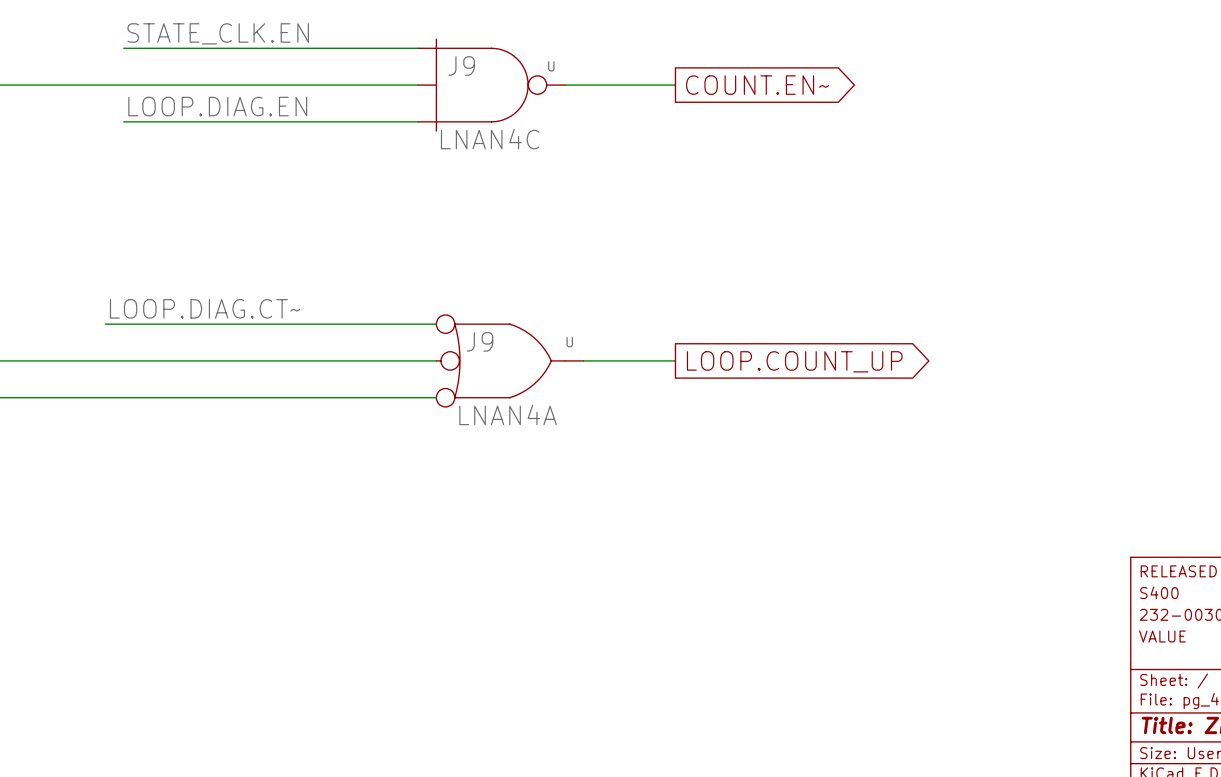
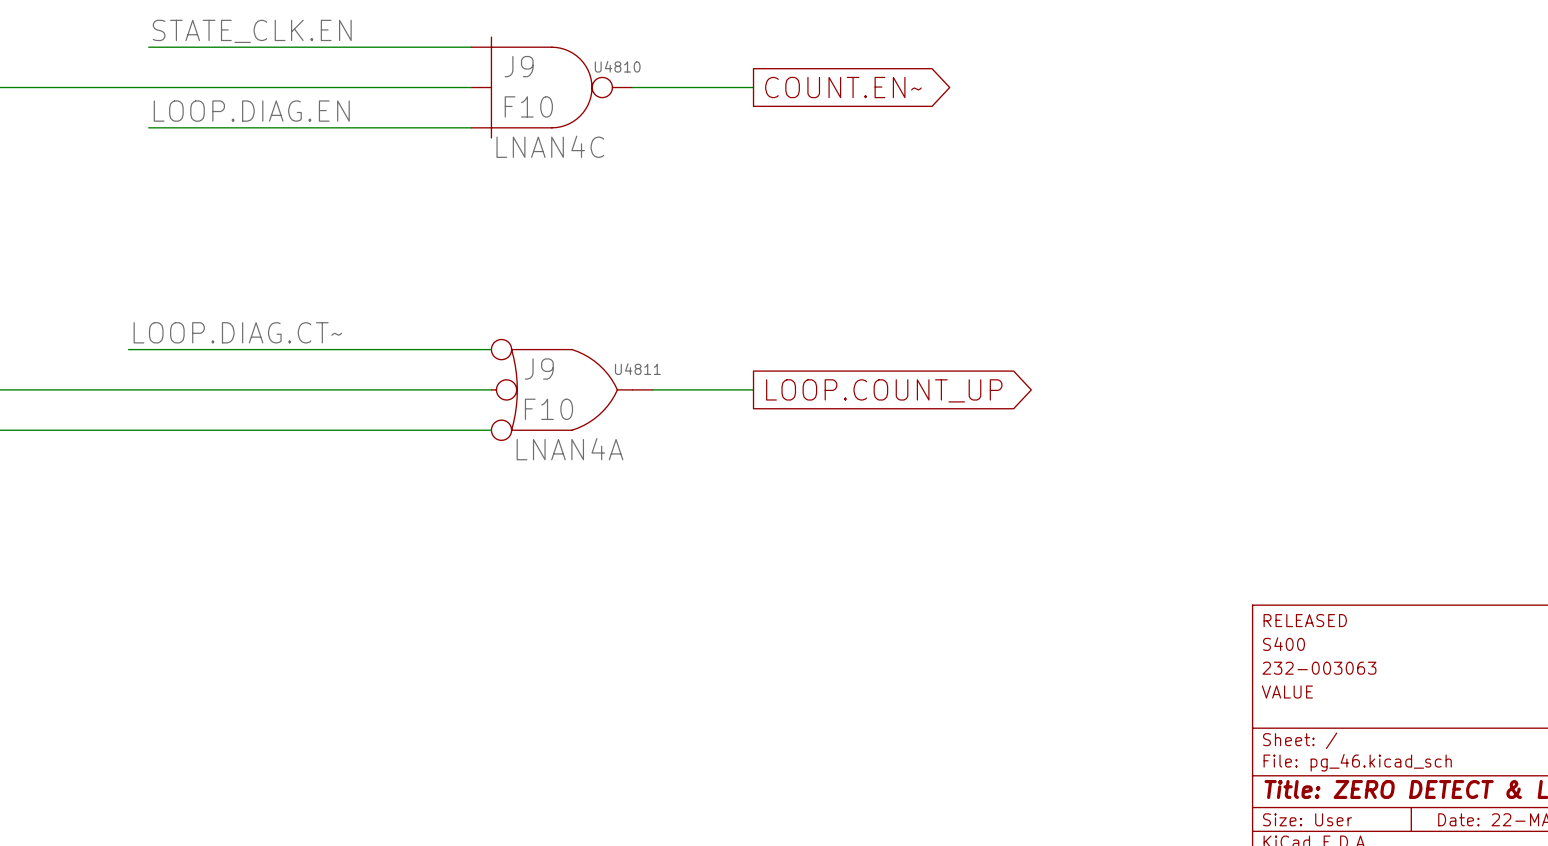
U name: U (551, 66) -> U4810 (617, 66)
U value: none -> F10 (528, 106)
U name: U (569, 342) -> U4811 (637, 369)
U value: none -> F10 (548, 409)

